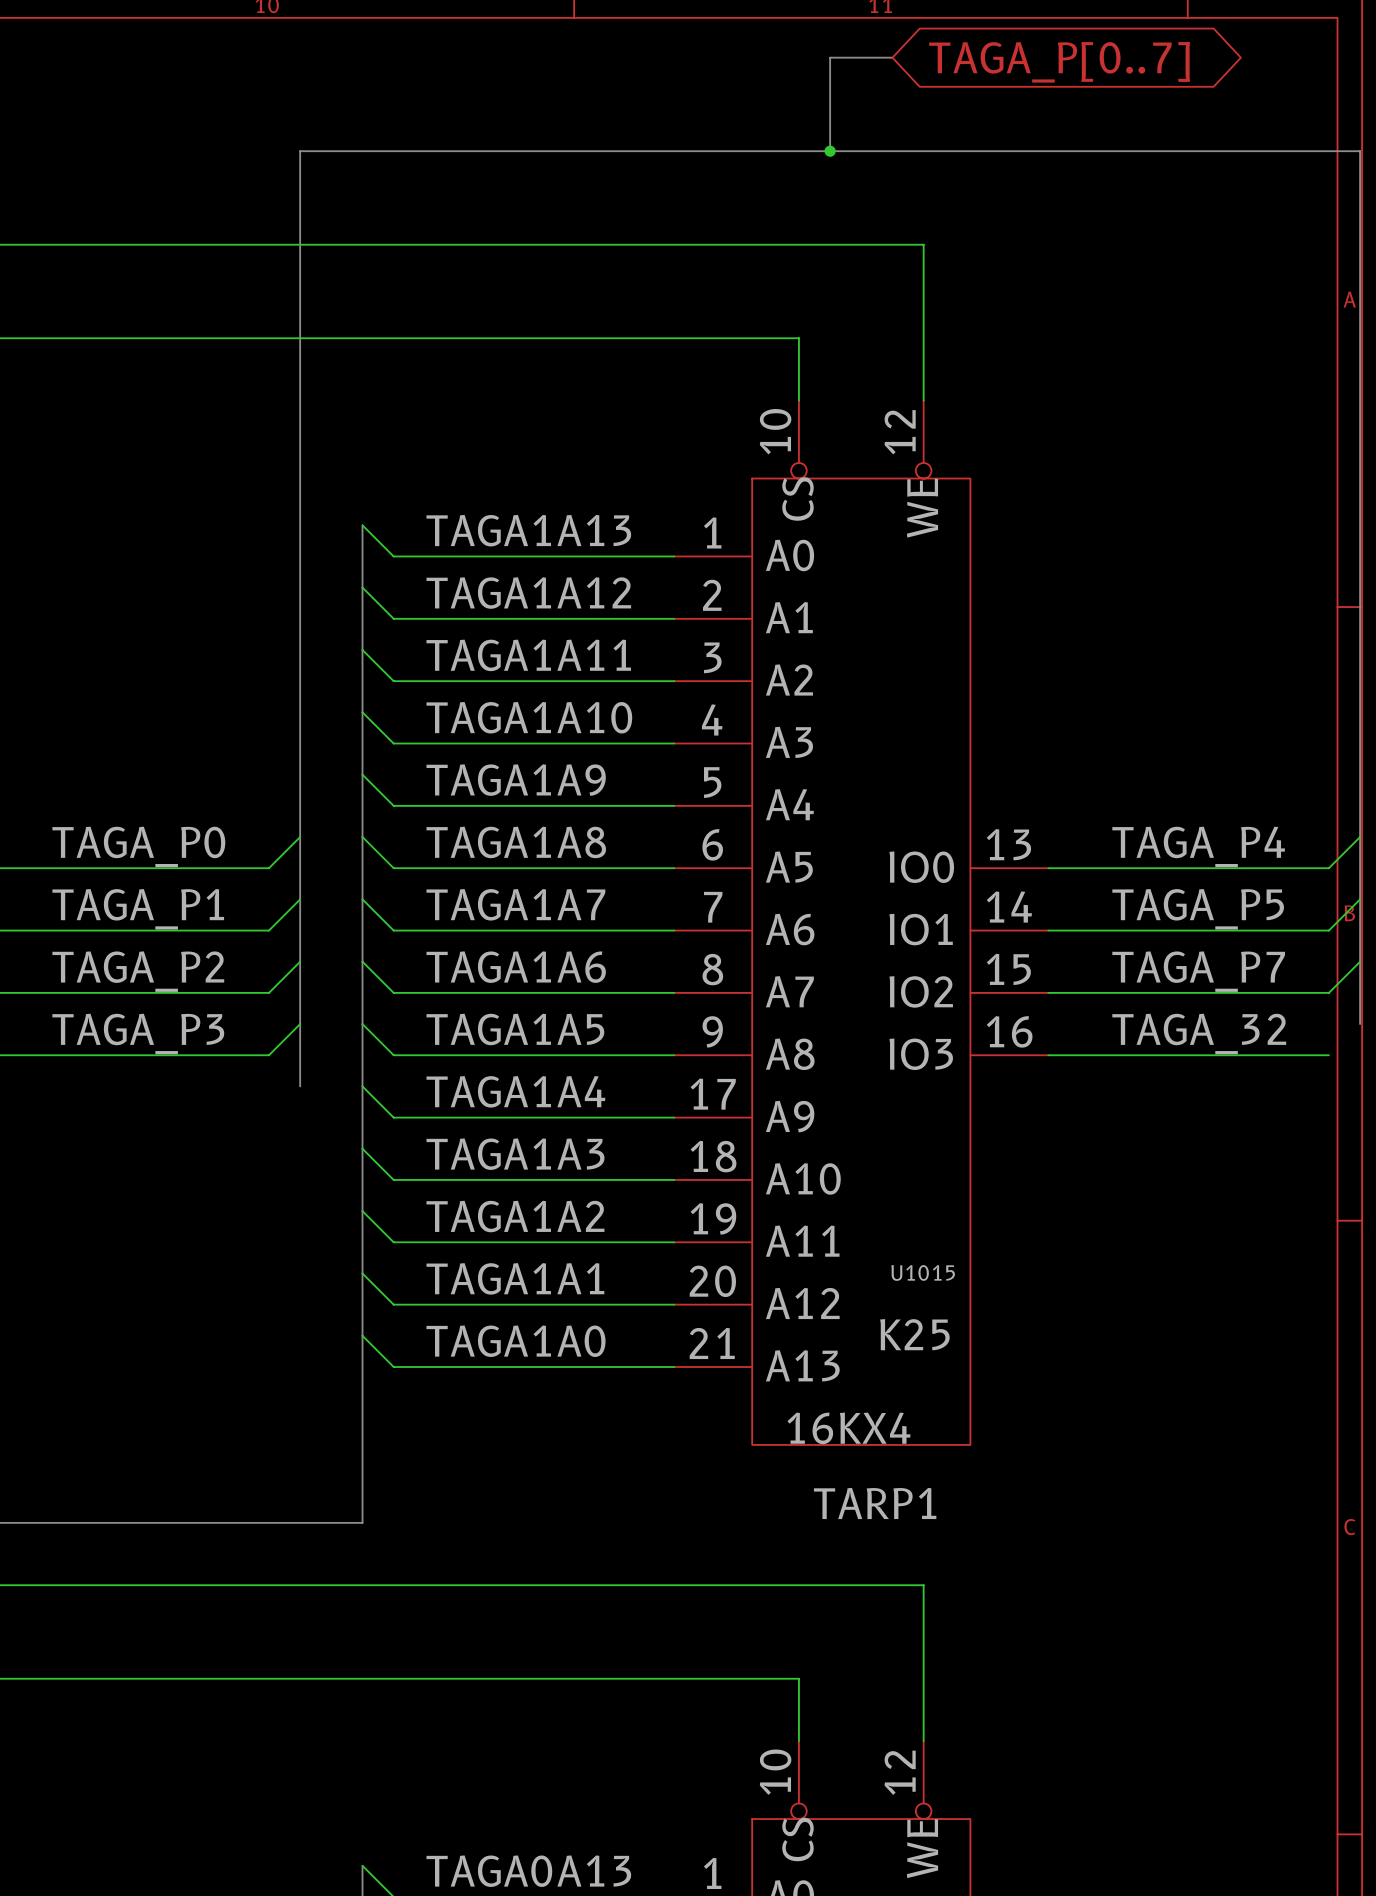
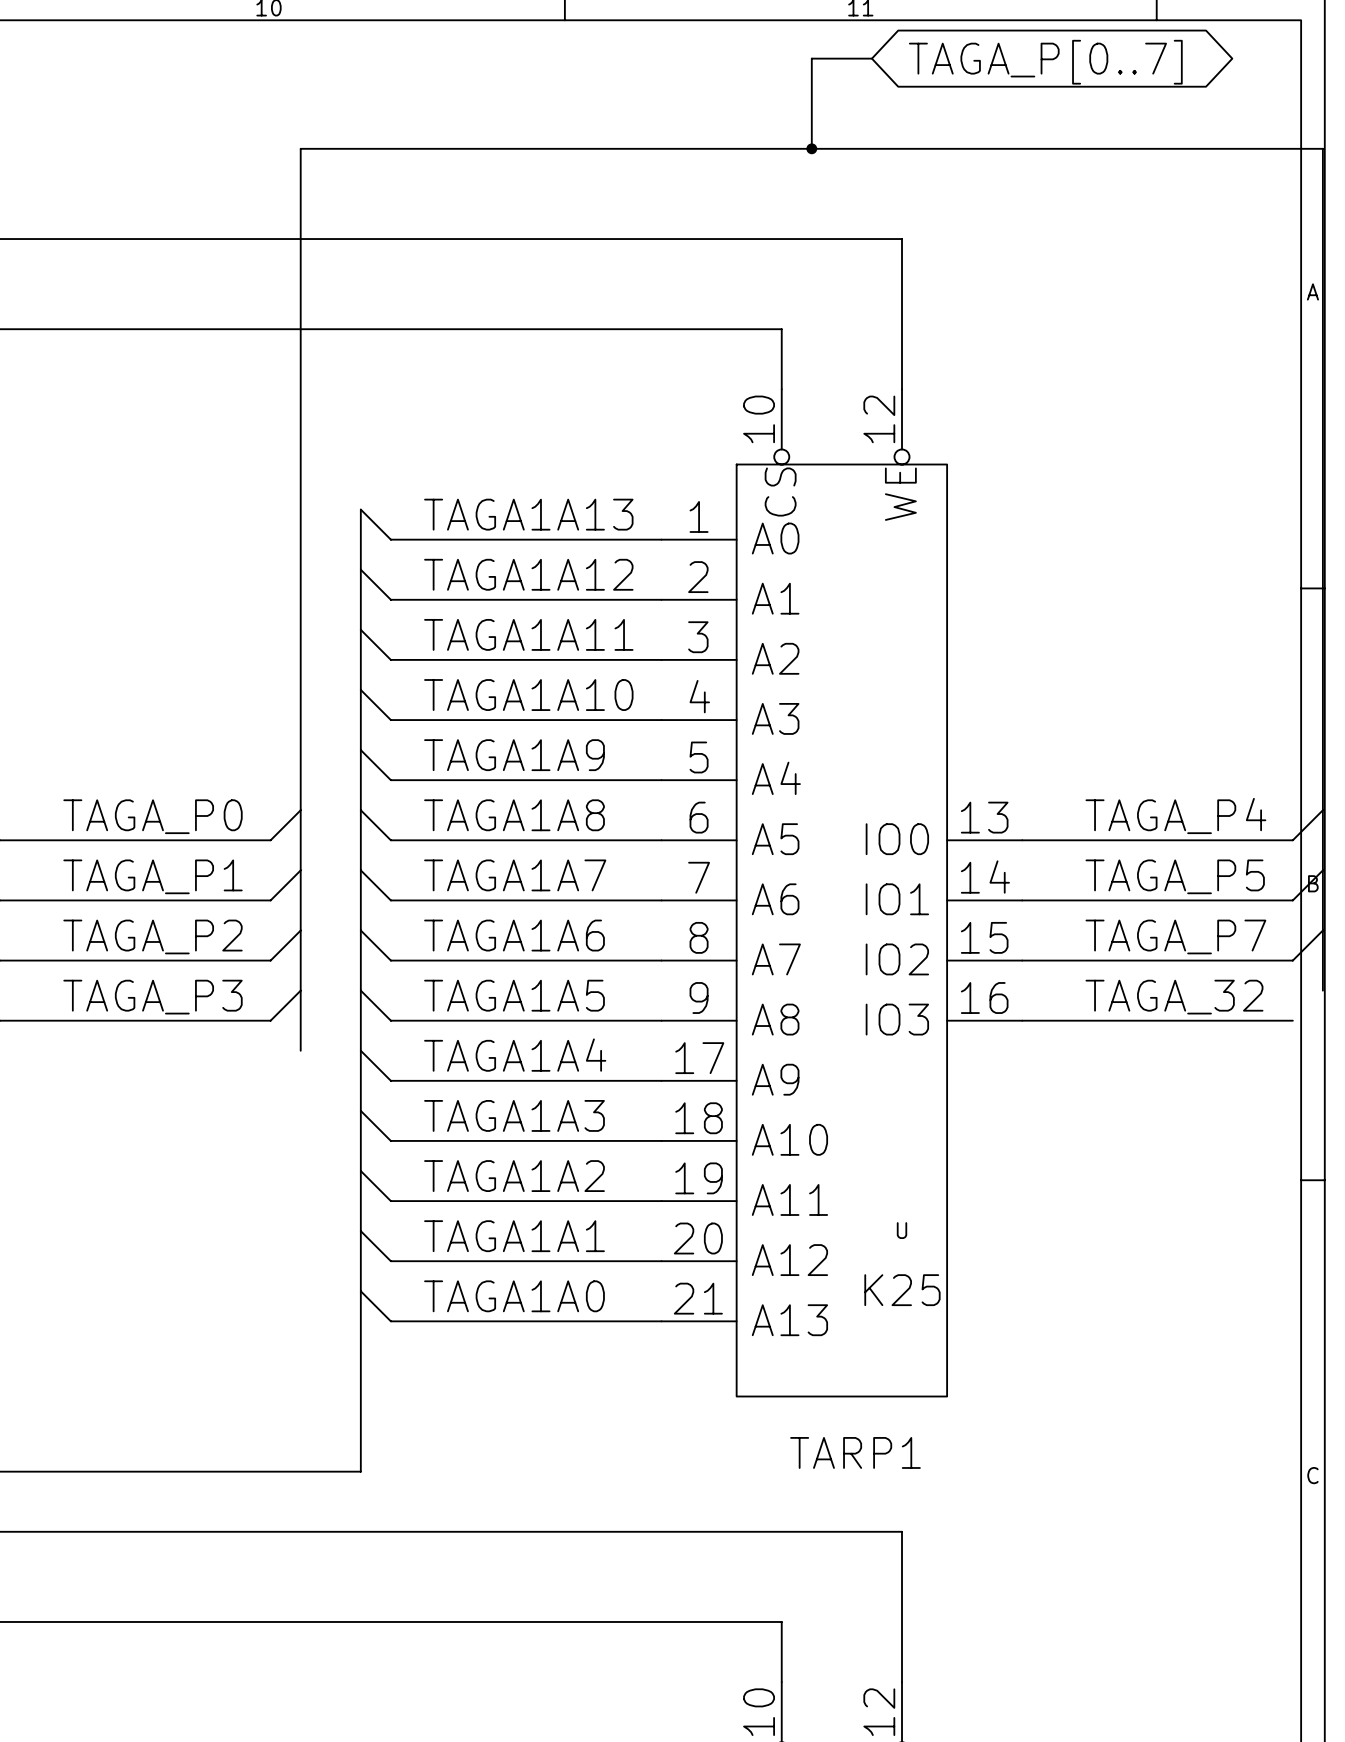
U1015 name: U1015 (923, 1272) -> U (902, 1230)
U1015 value: 16KX4 (848, 1428) -> none

